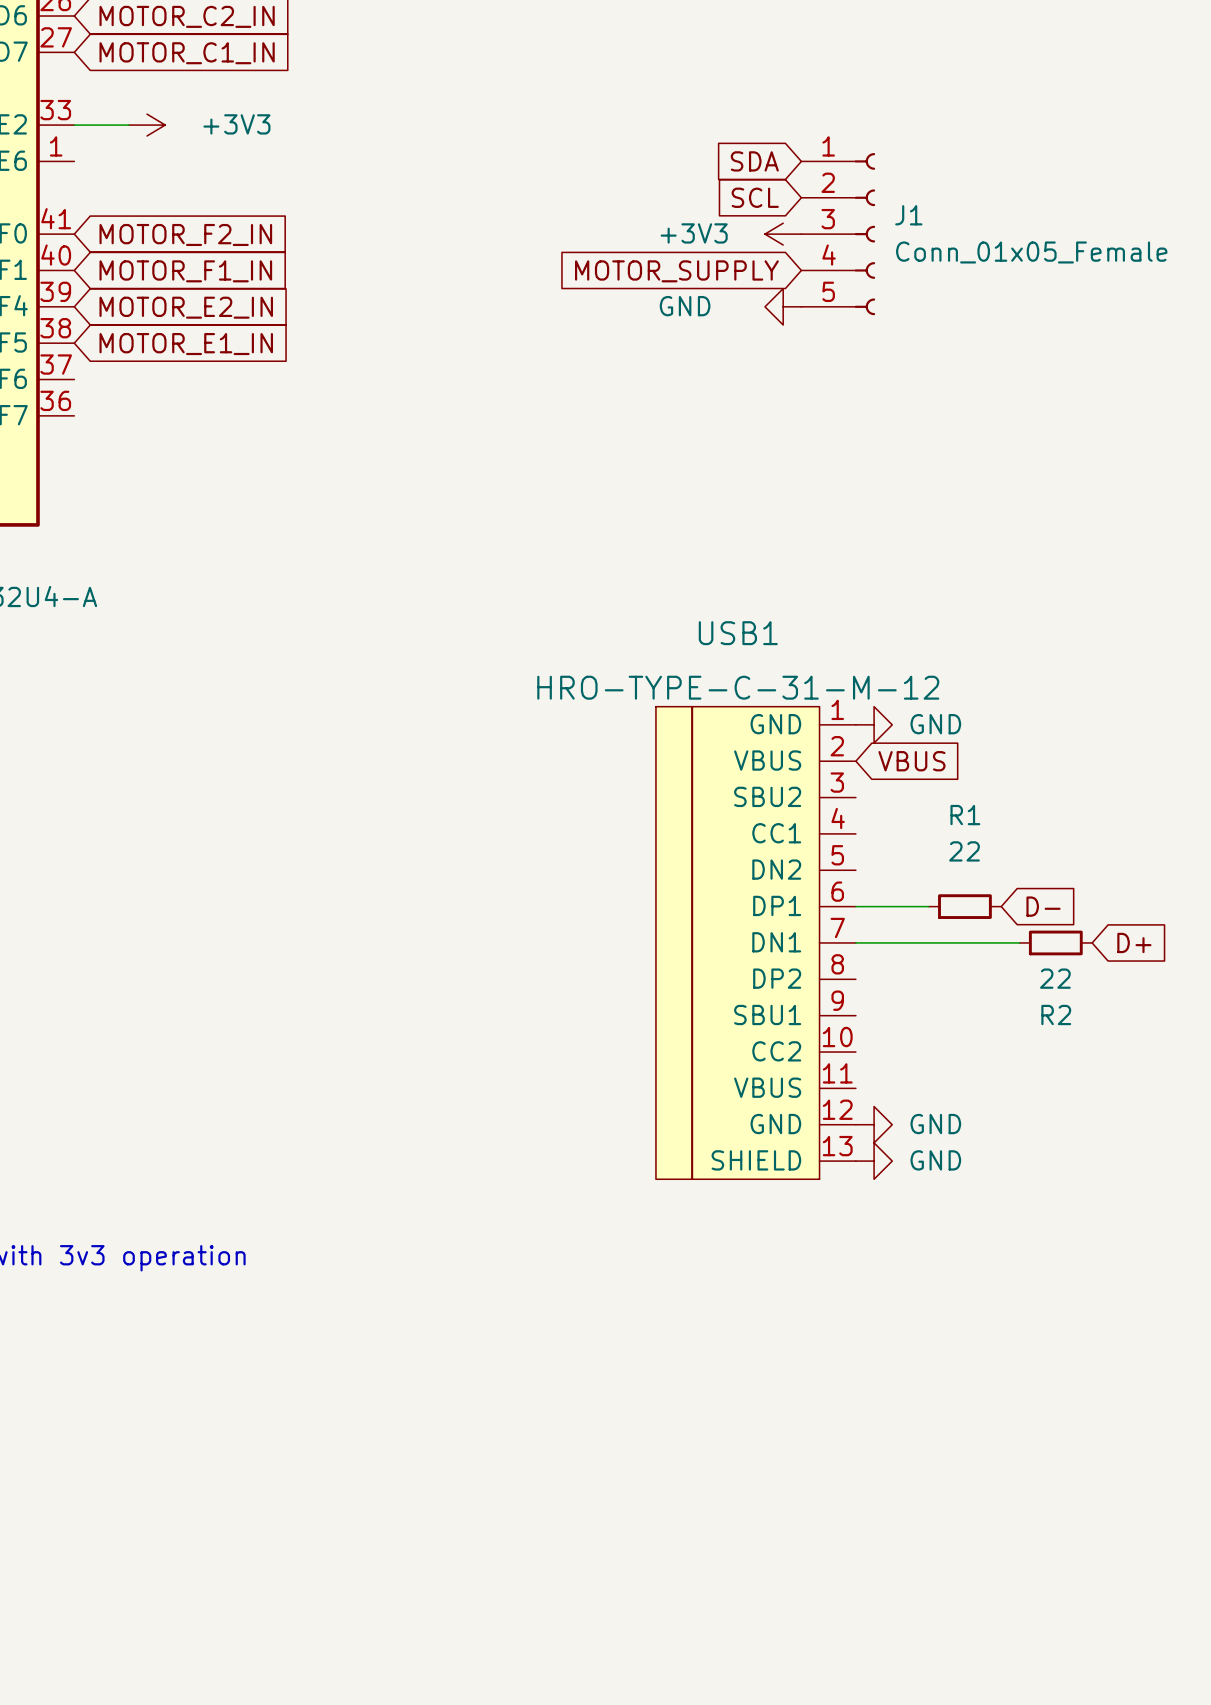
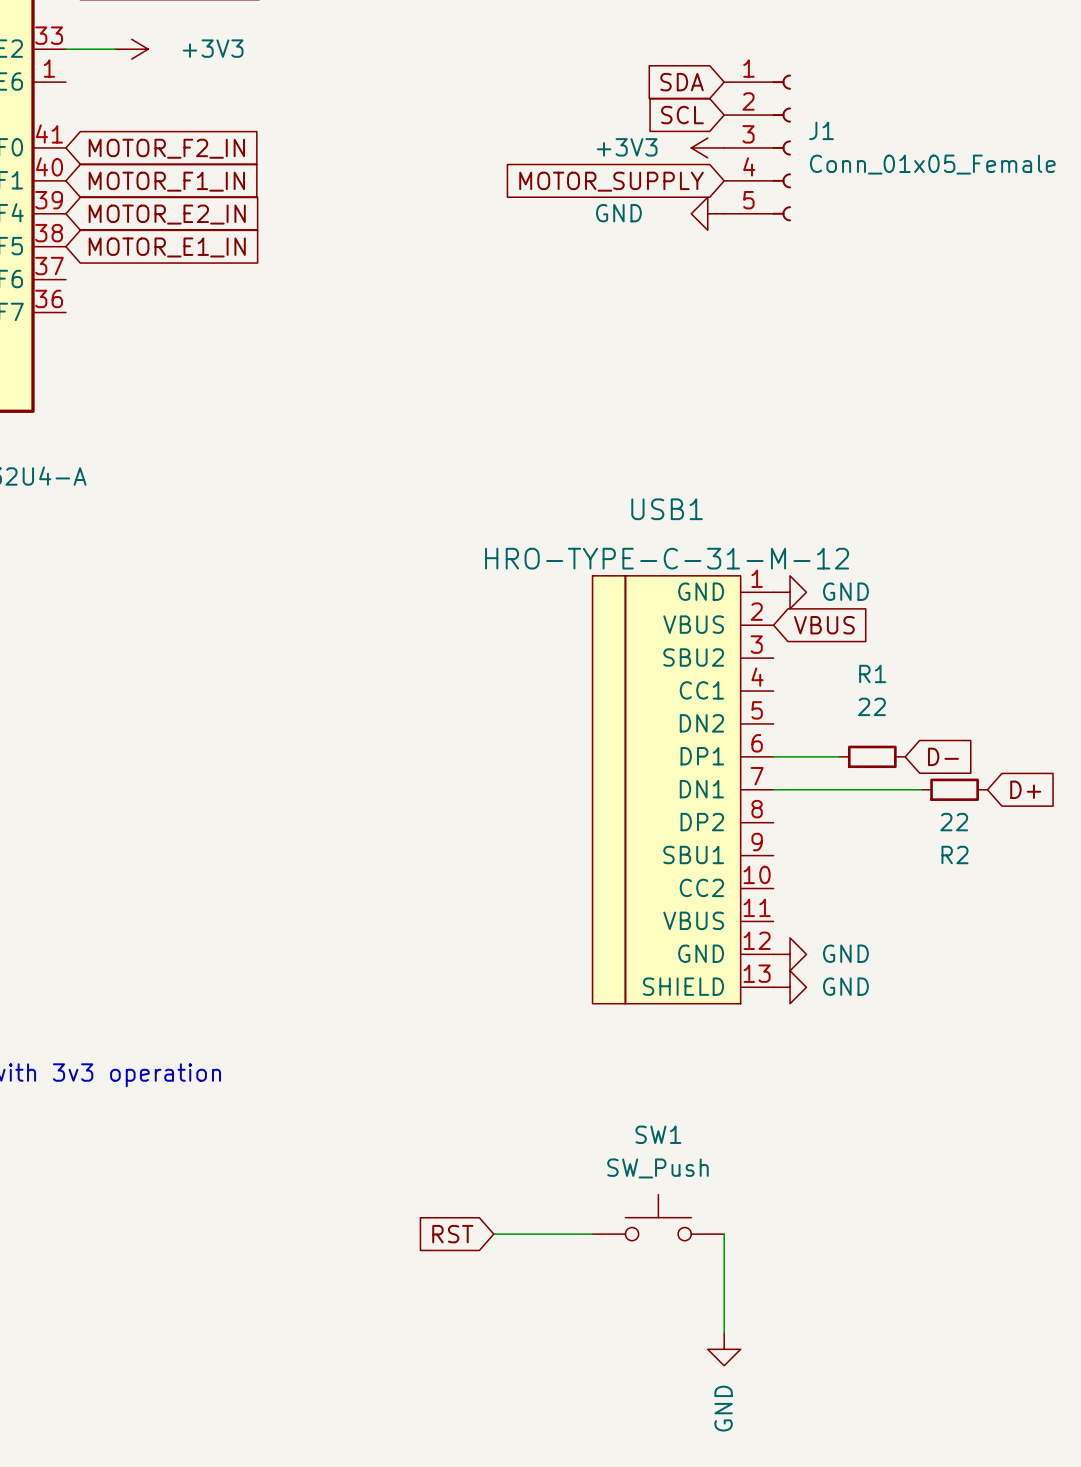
SW1: none -> SW_Push (658, 1217)
global label: none -> RST (452, 1234)
wire: none -> (493, 1234) (592, 1234)
wire: none -> (724, 1234) (724, 1332)
power symbol: none -> GND (724, 1349)

